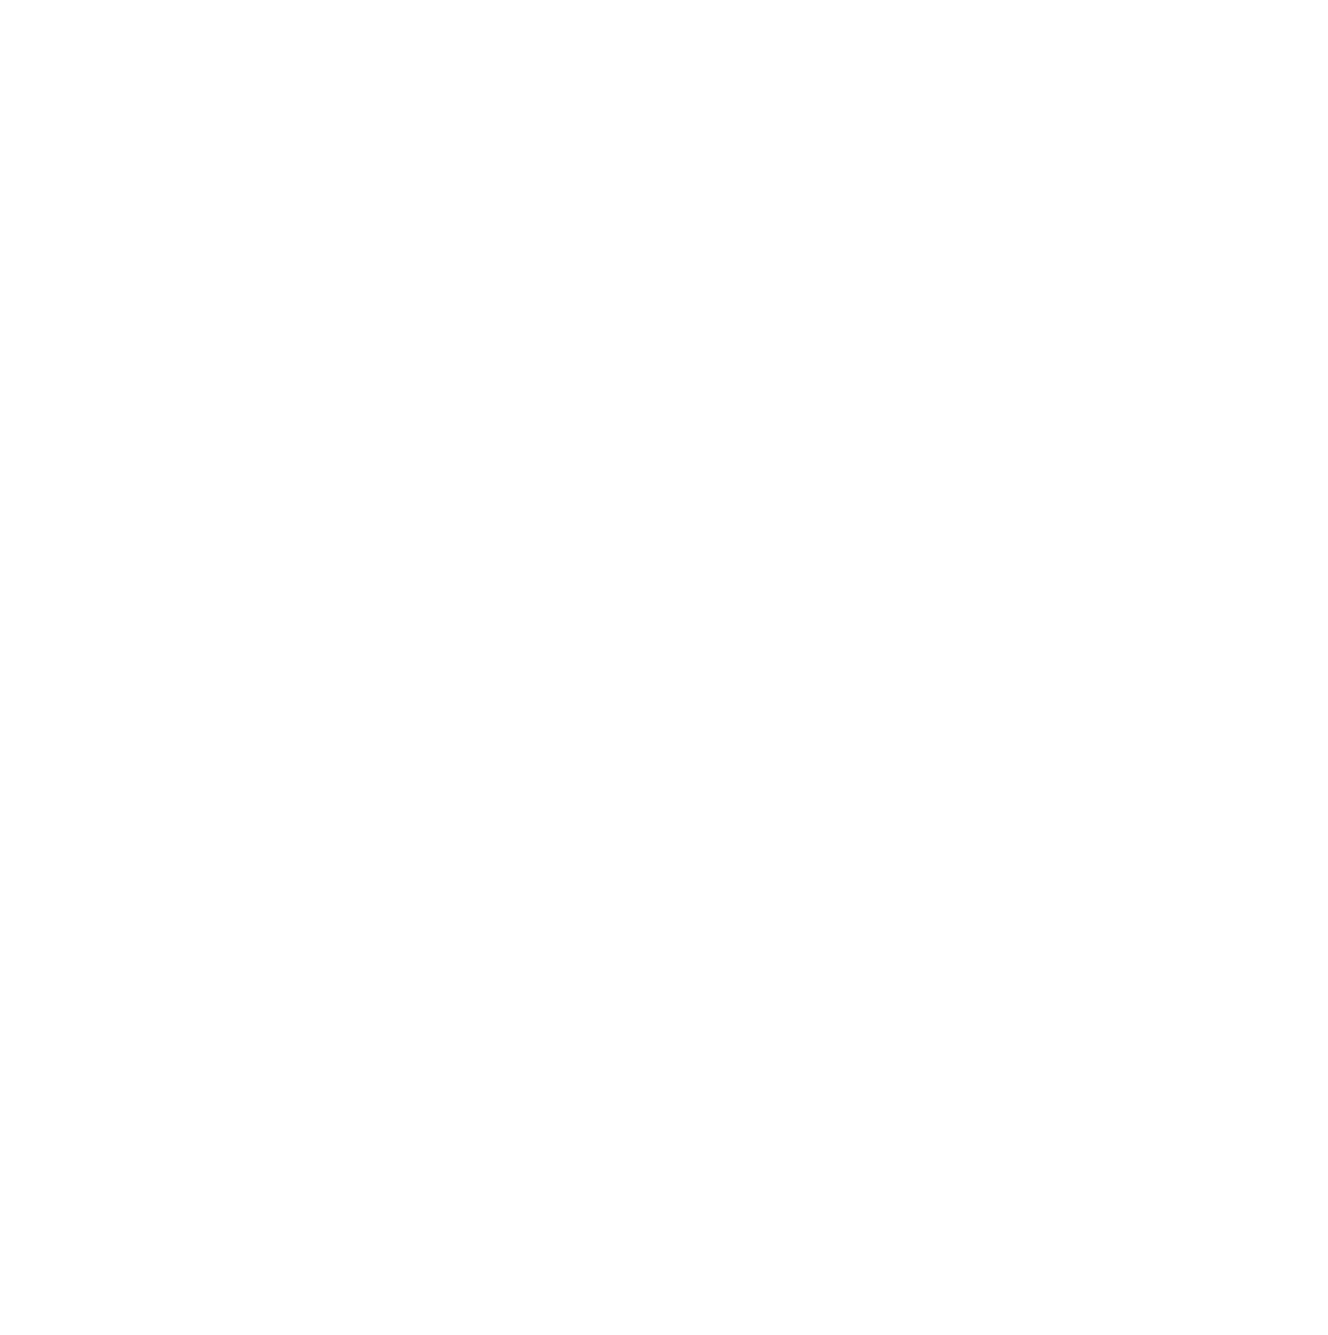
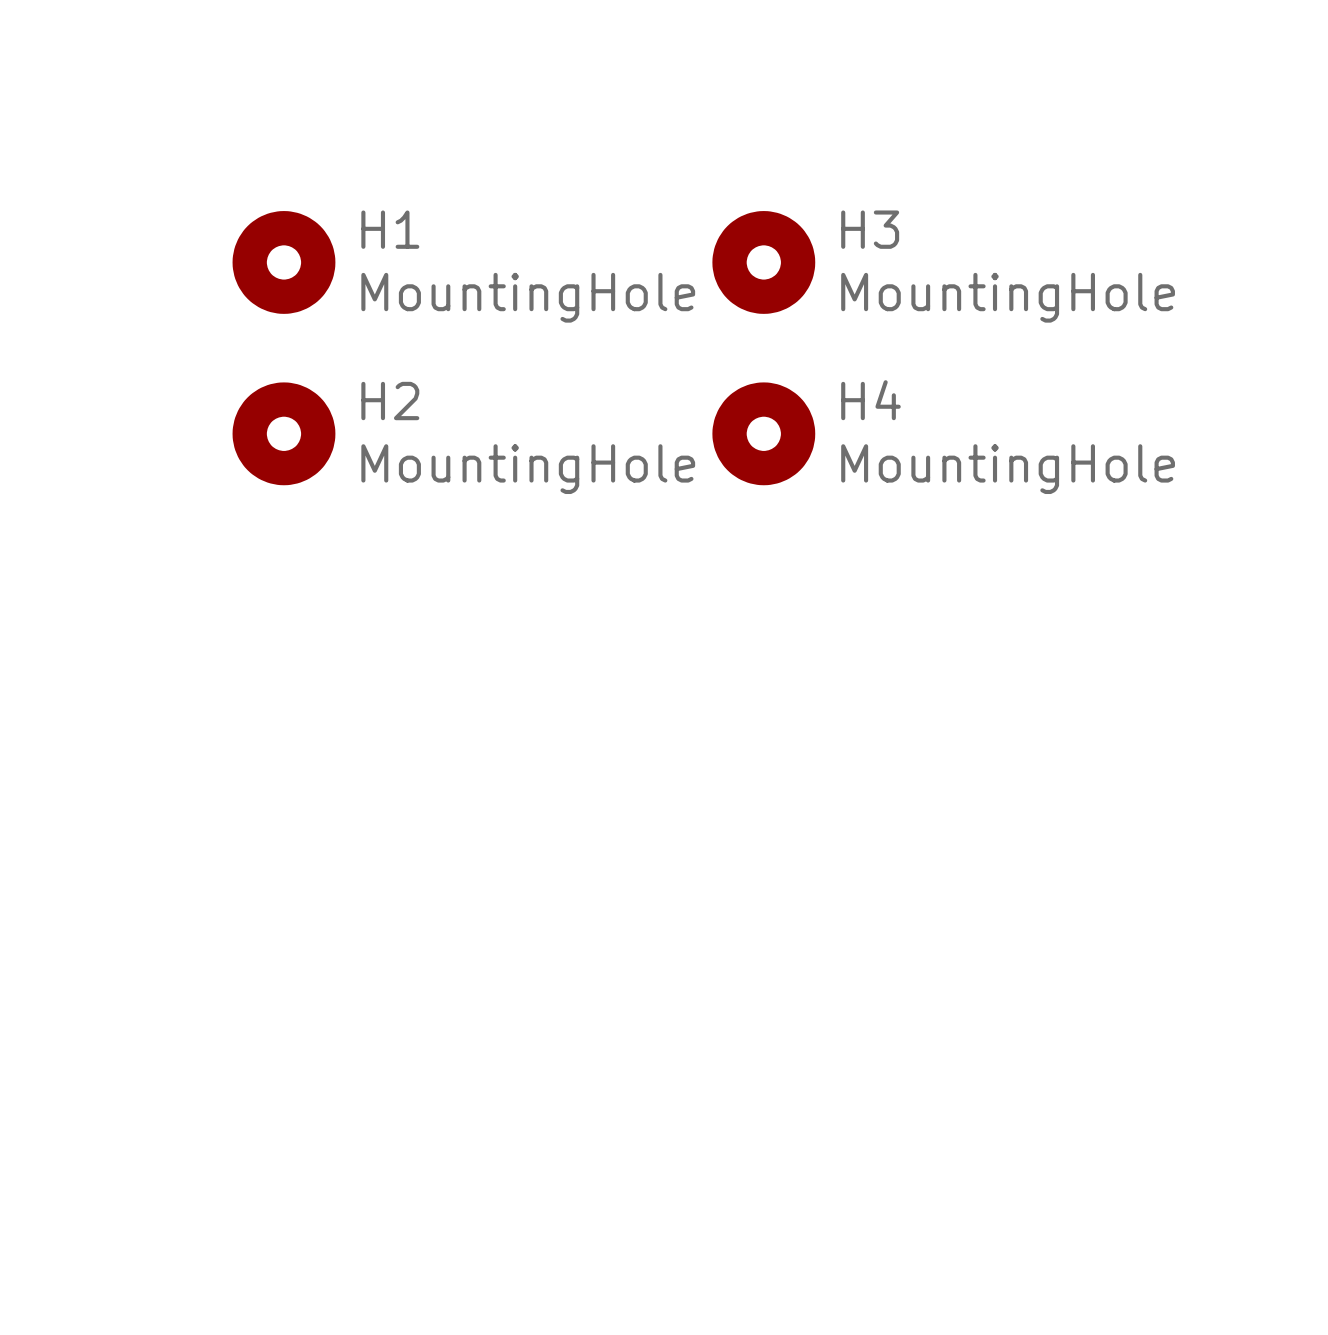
H1: none -> MountingHole (283, 262)
H3: none -> MountingHole (763, 262)
H2: none -> MountingHole (283, 433)
H4: none -> MountingHole (763, 433)

